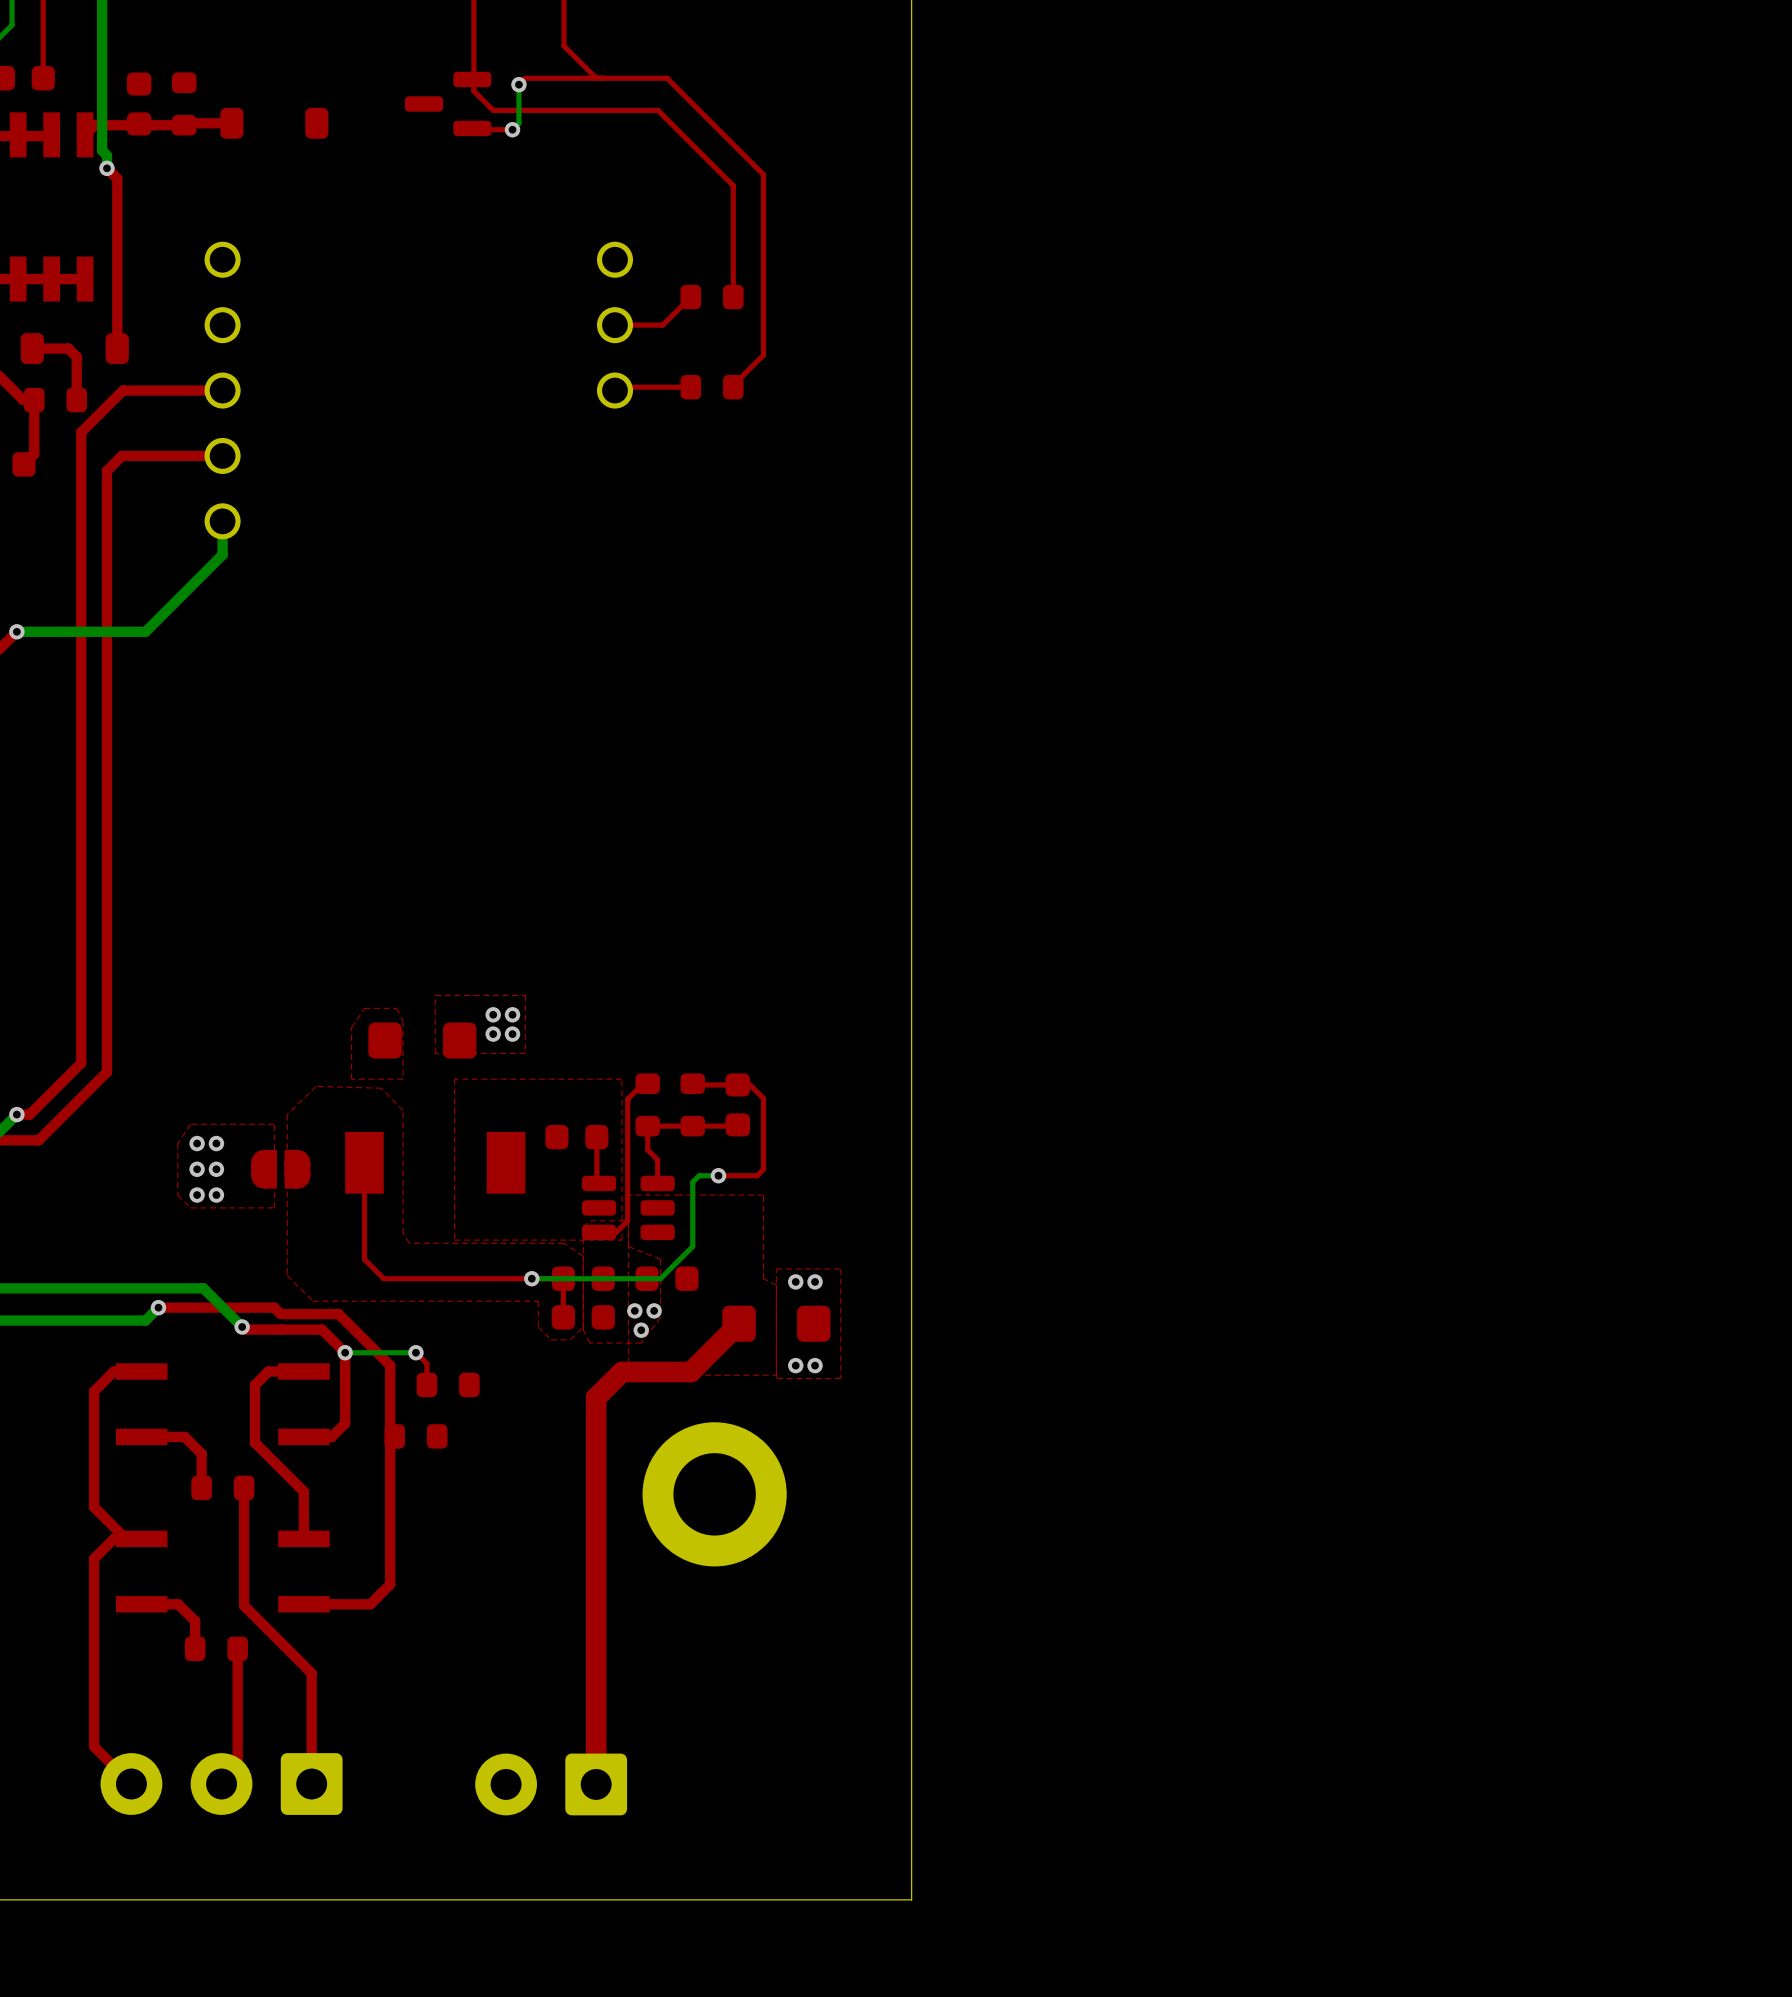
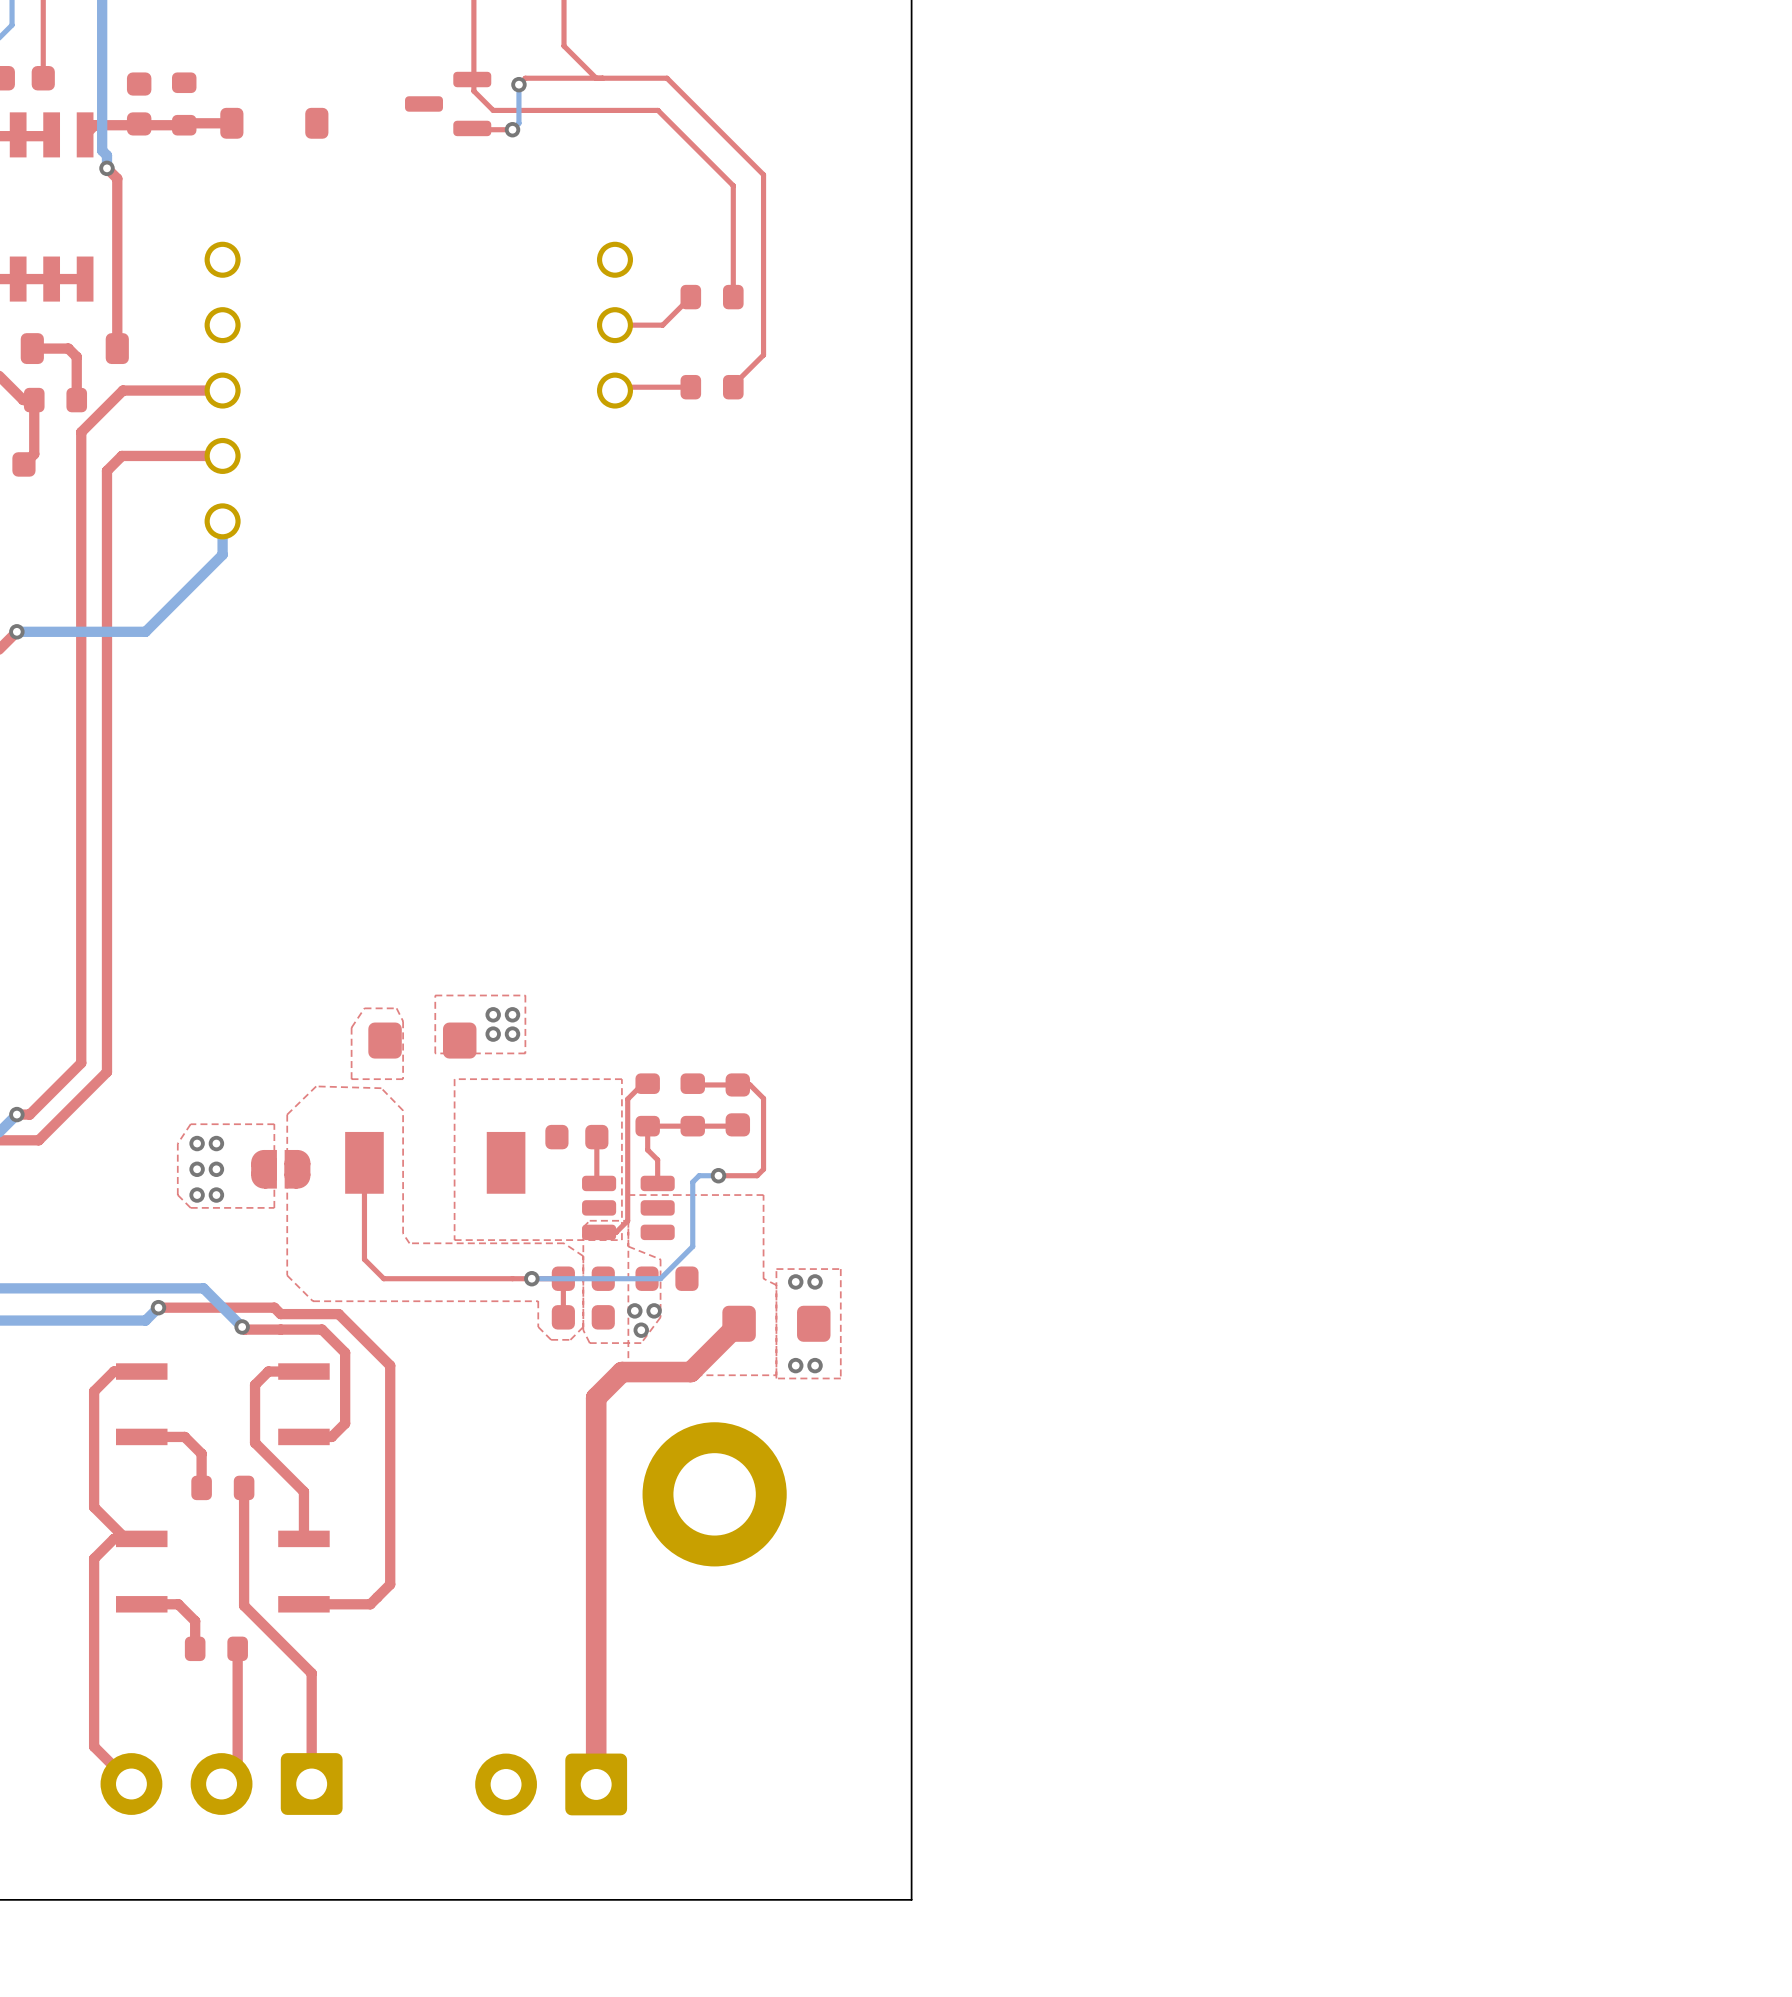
via: (345, 1352) -> none
top track: (415, 1352) (426, 1363) (426, 1384) -> none
bottom track: (415, 1352) (345, 1352) -> none
via: (415, 1352) -> none
part: (448, 1384) -> none
part: (415, 1436) -> none

